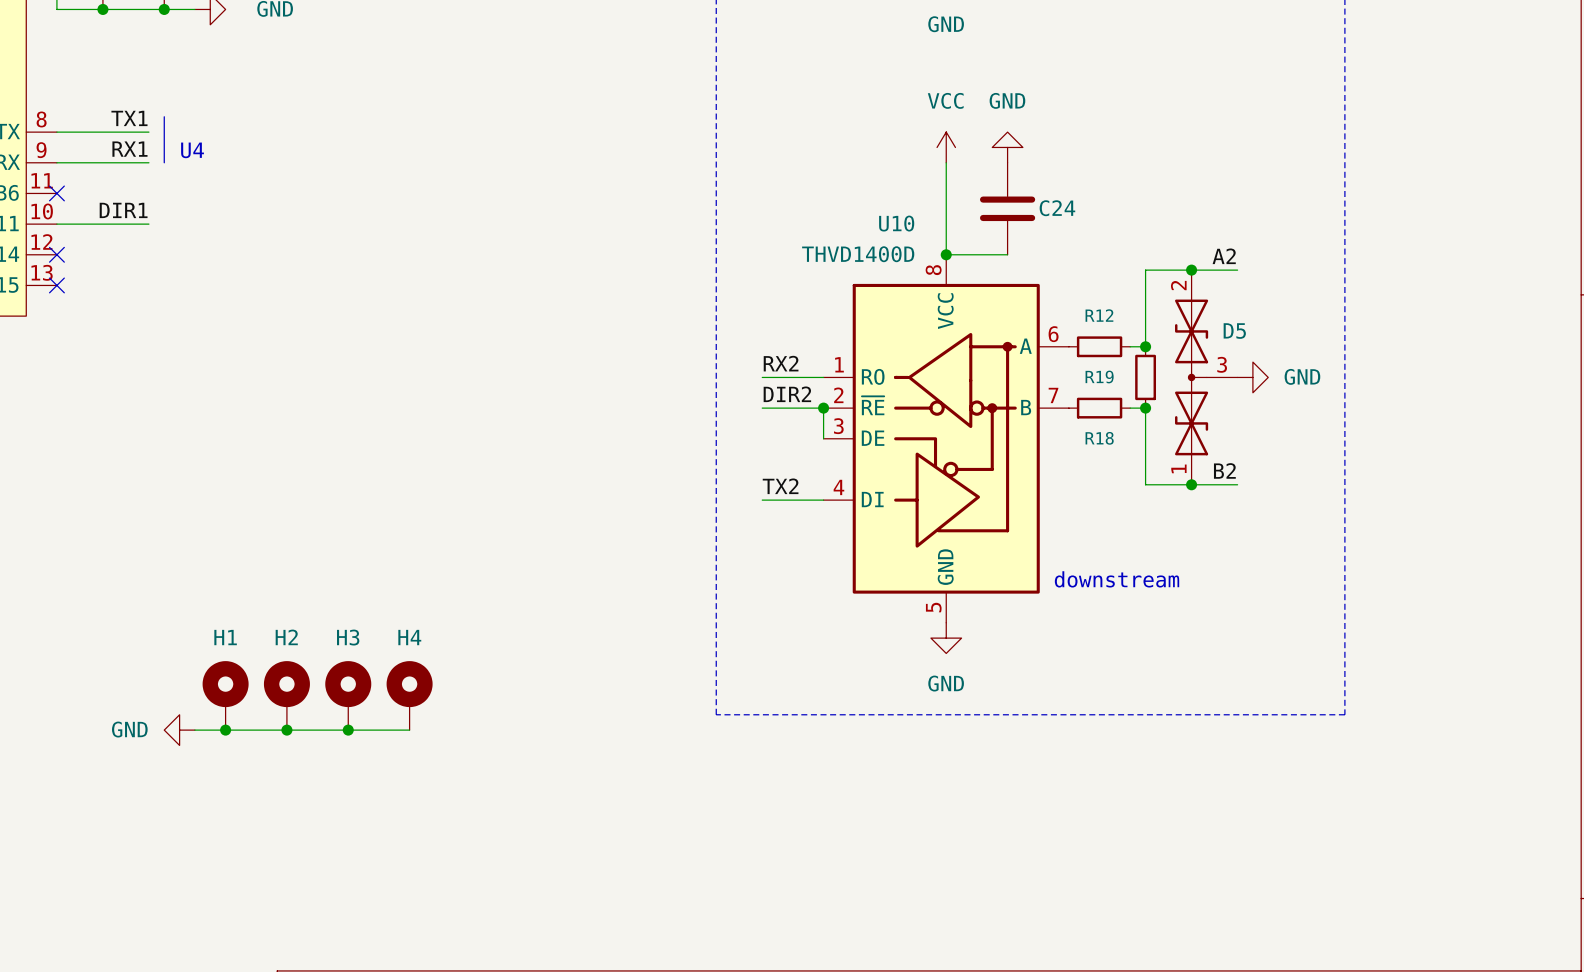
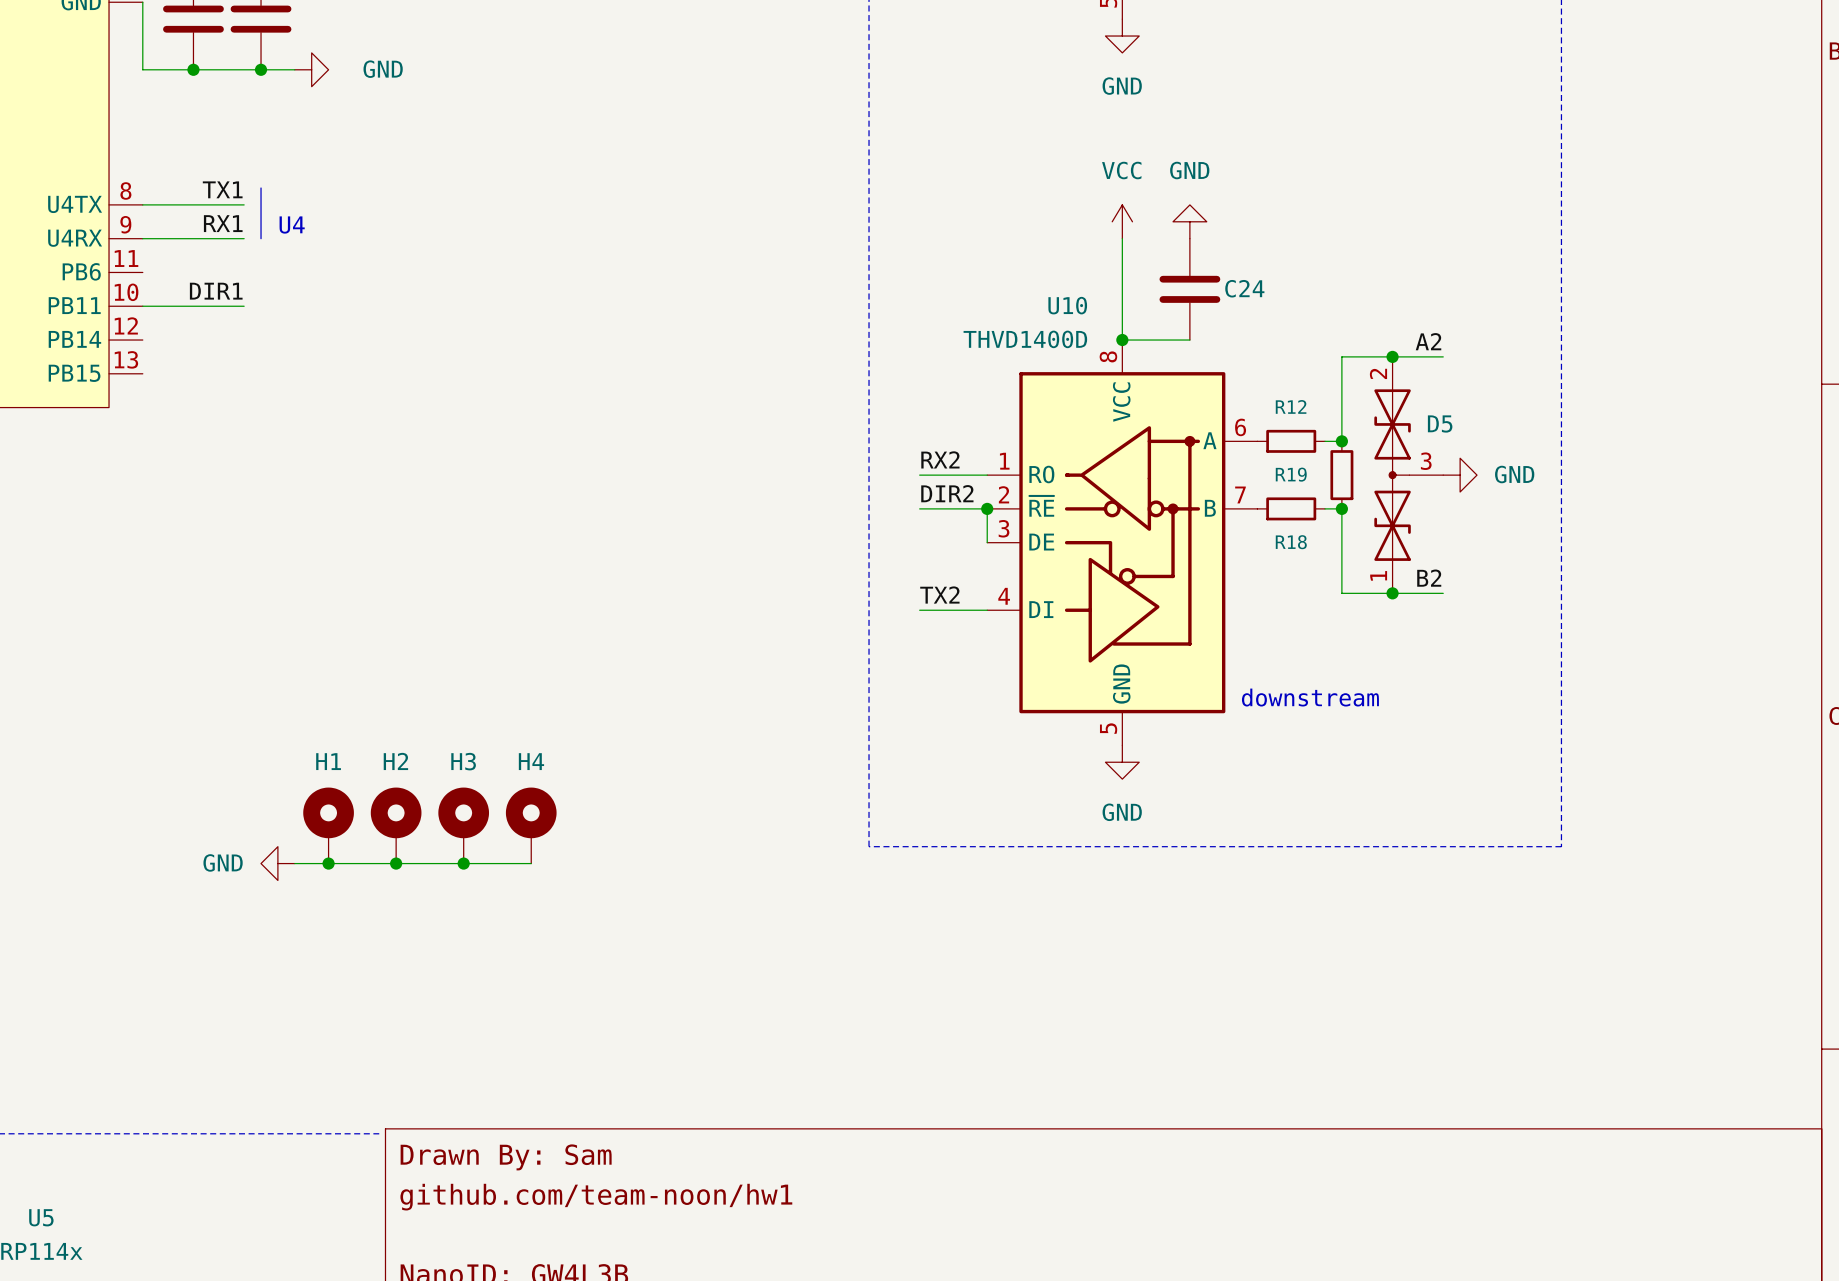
no-connect mark: (56, 193) -> none
no-connect mark: (56, 254) -> none
no-connect mark: (56, 285) -> none

